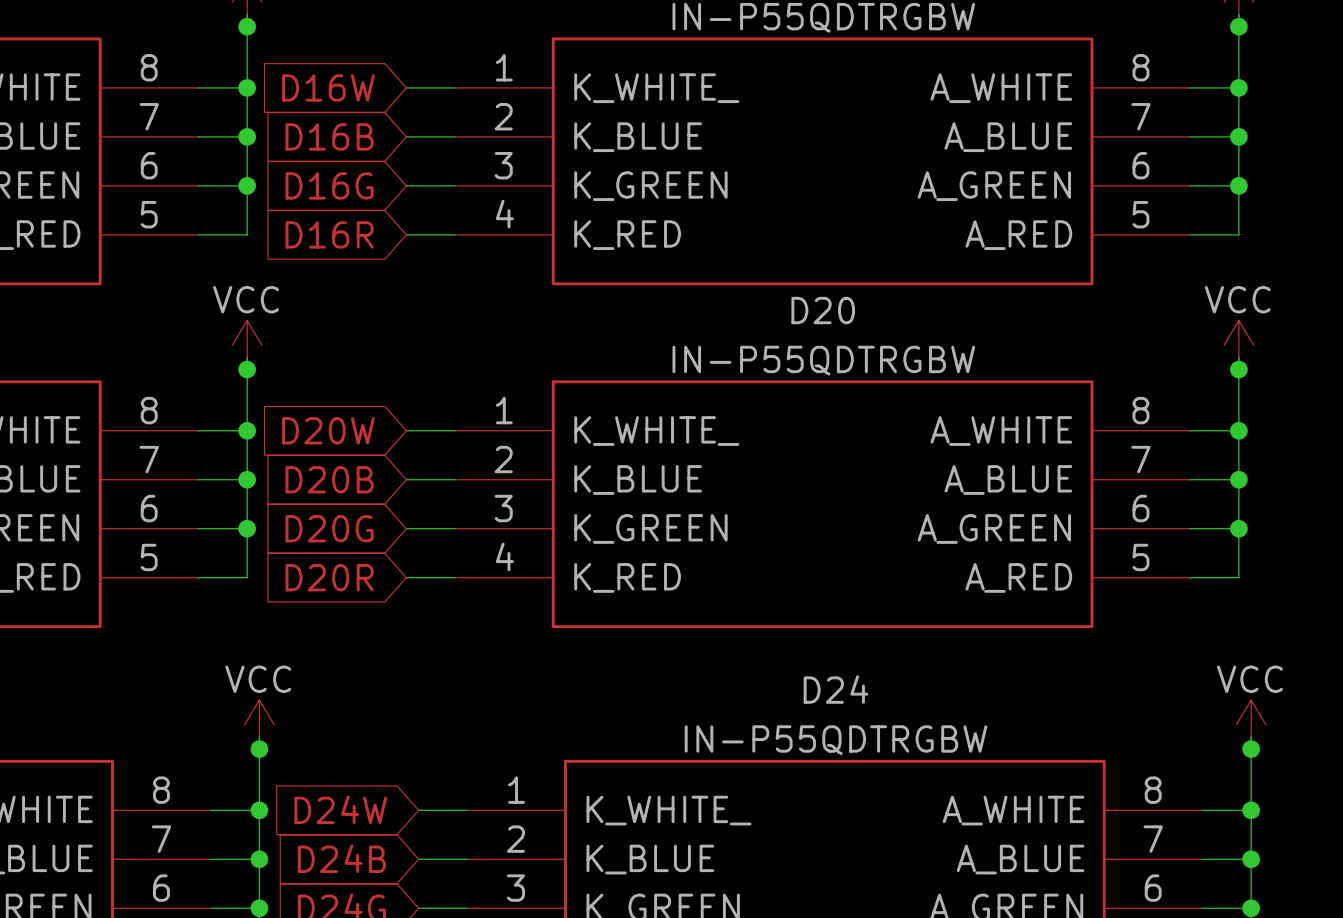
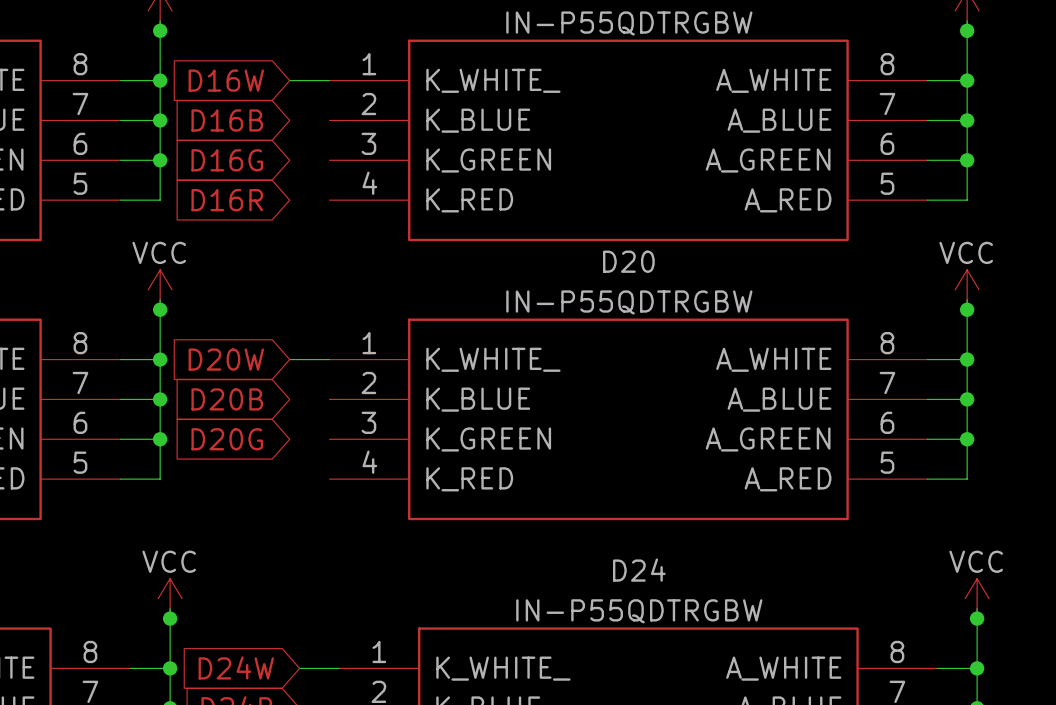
wire: (406, 136) (455, 136) -> none
wire: (406, 185) (455, 185) -> none
wire: (406, 234) (455, 234) -> none
wire: (406, 479) (455, 479) -> none
wire: (406, 528) (455, 528) -> none
global label: D20R (329, 577) -> none
wire: (406, 577) (455, 577) -> none

